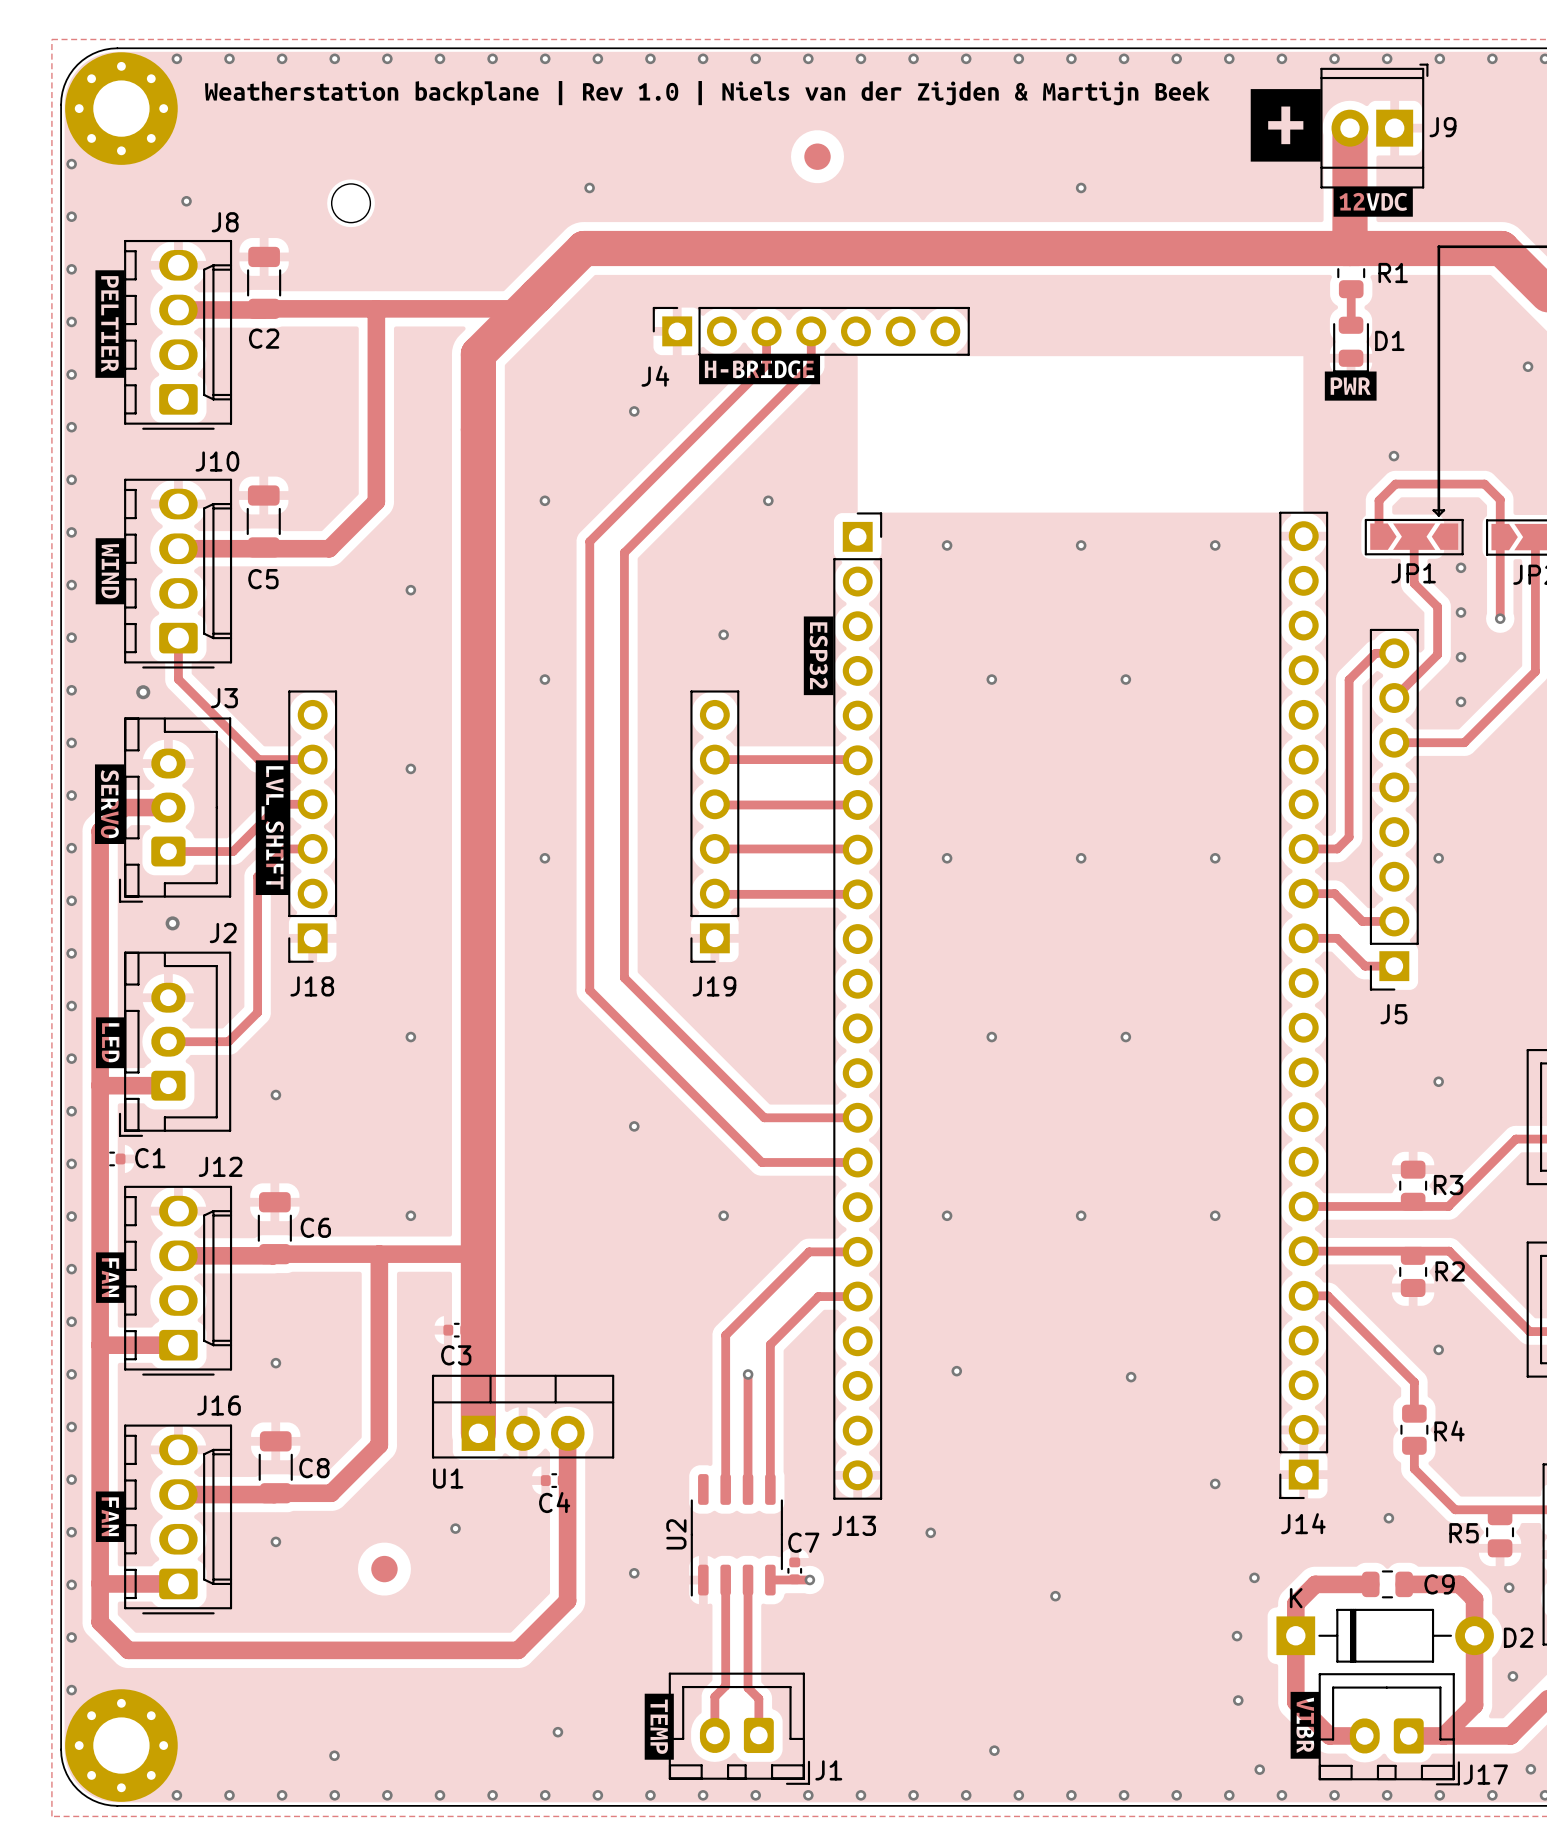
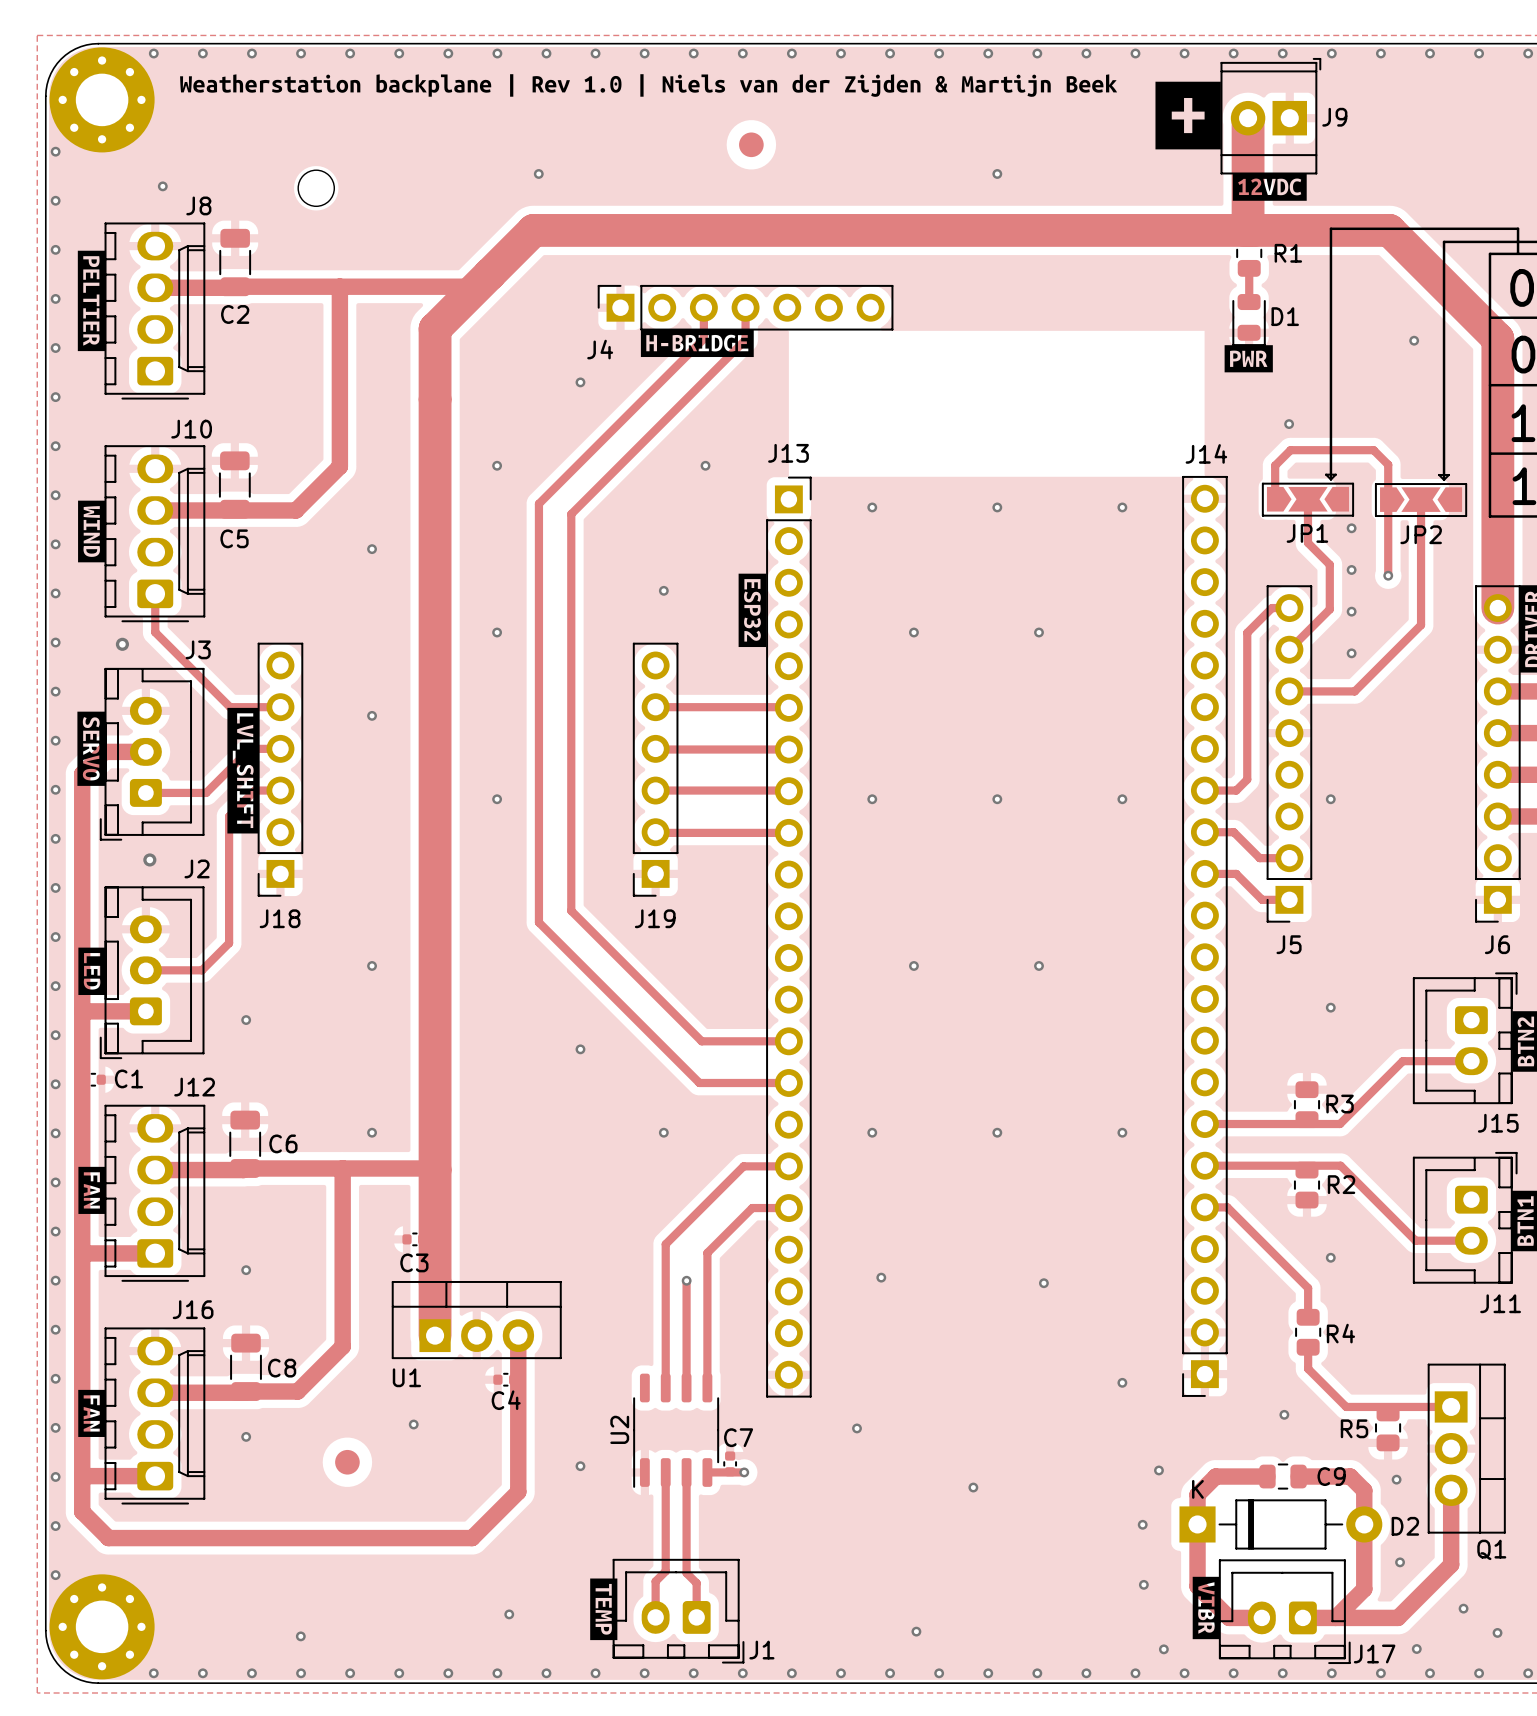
J14 name position: J14 (1303, 1523) -> J14 (1206, 453)
J13 name position: J13 (854, 1525) -> J13 (788, 453)

